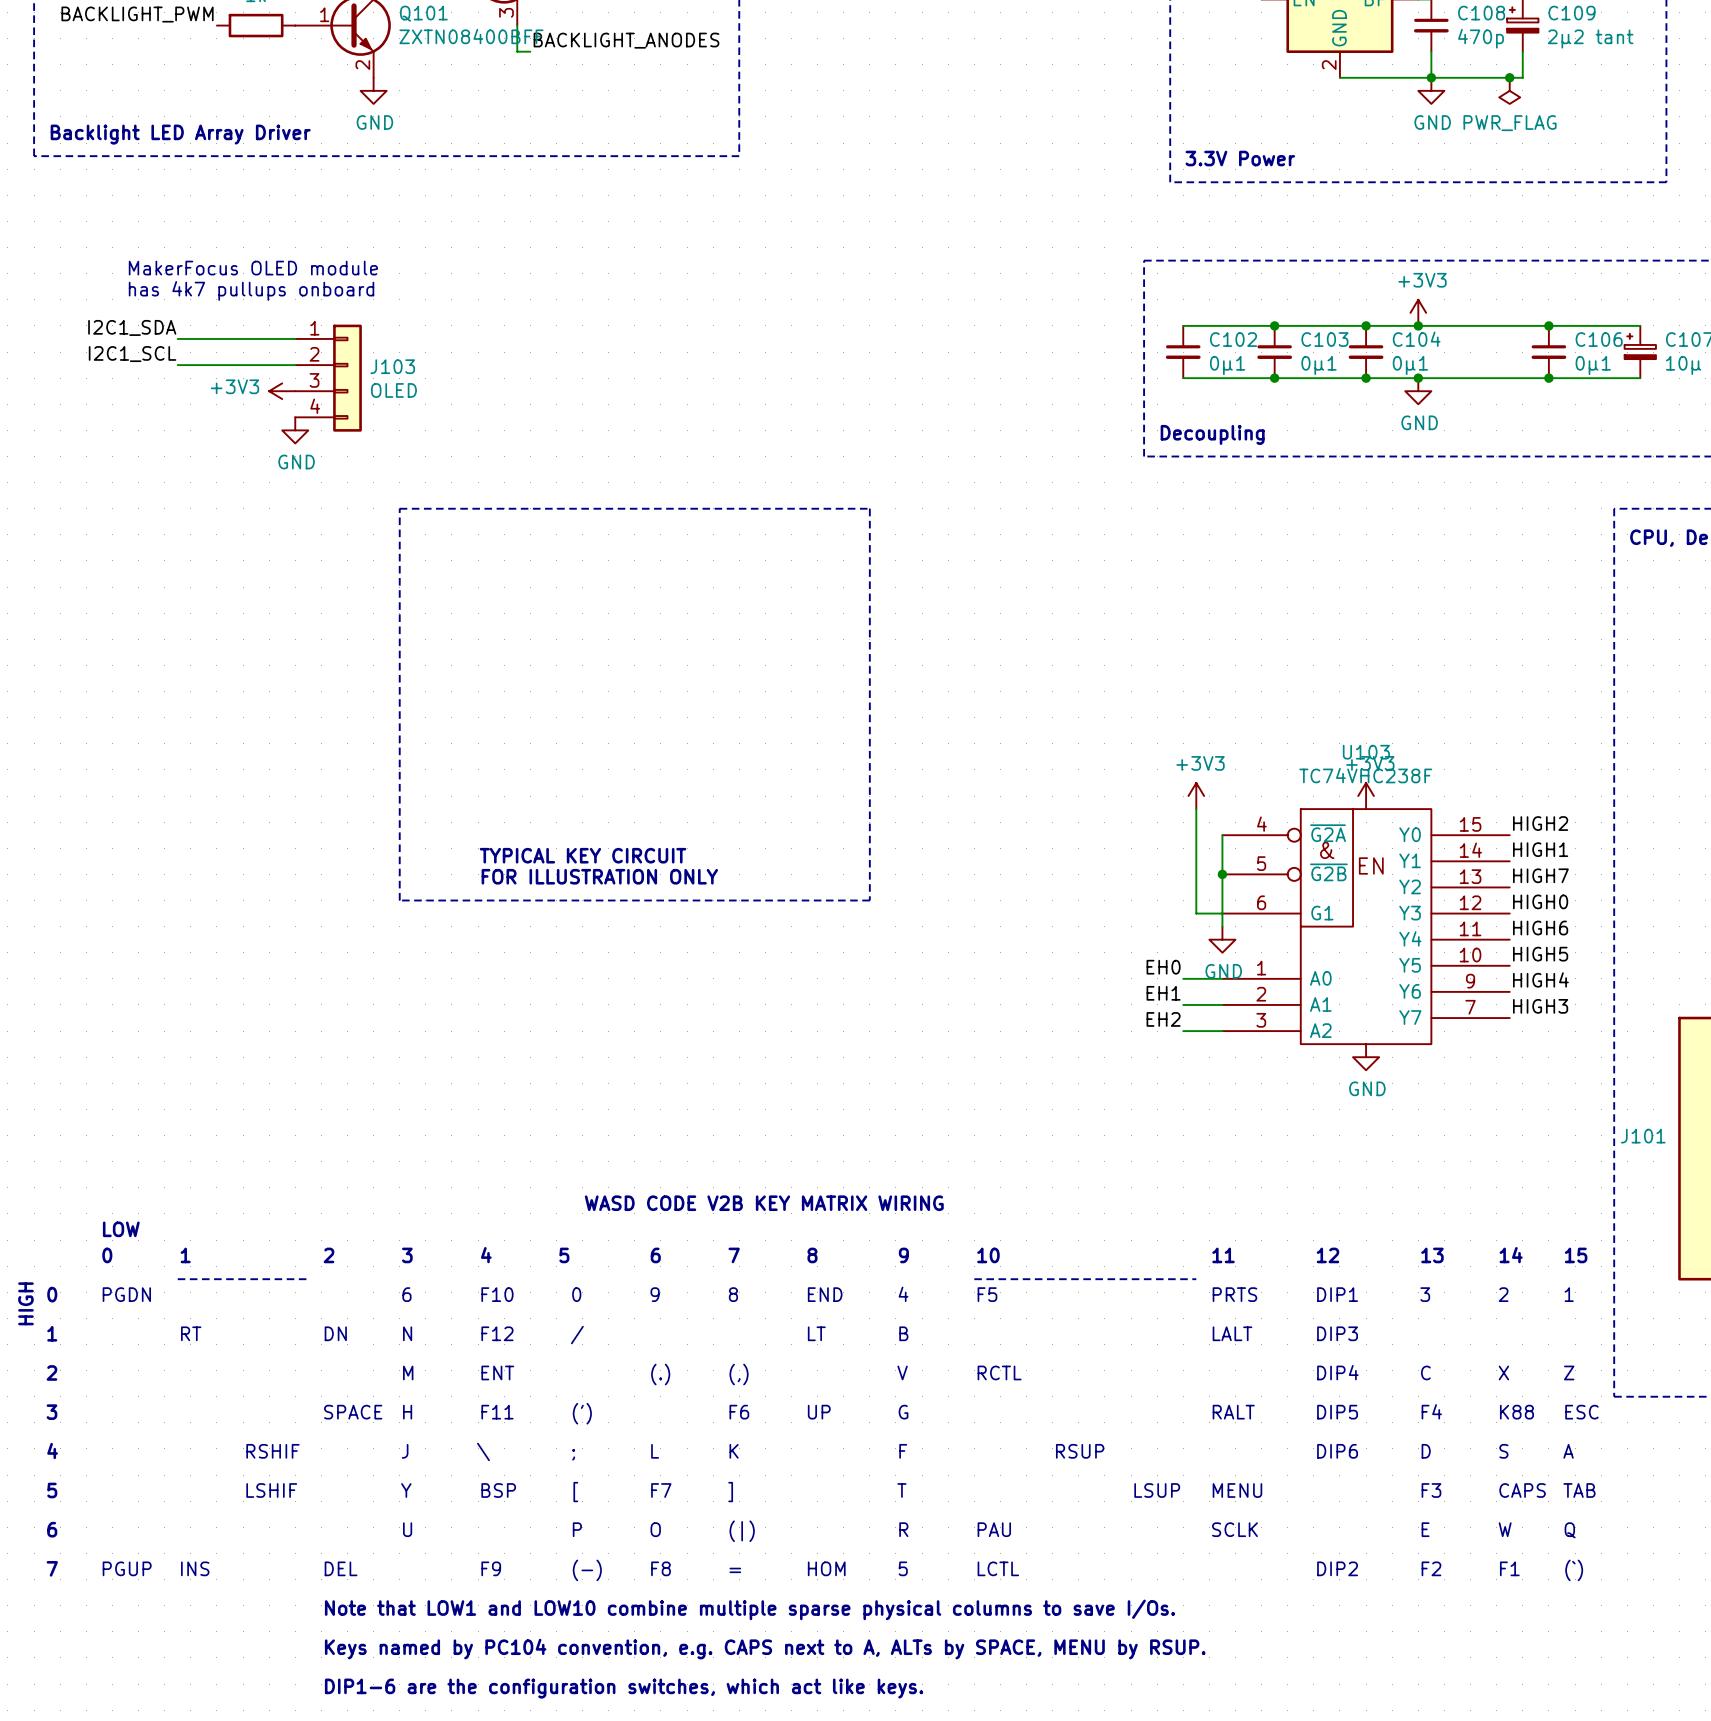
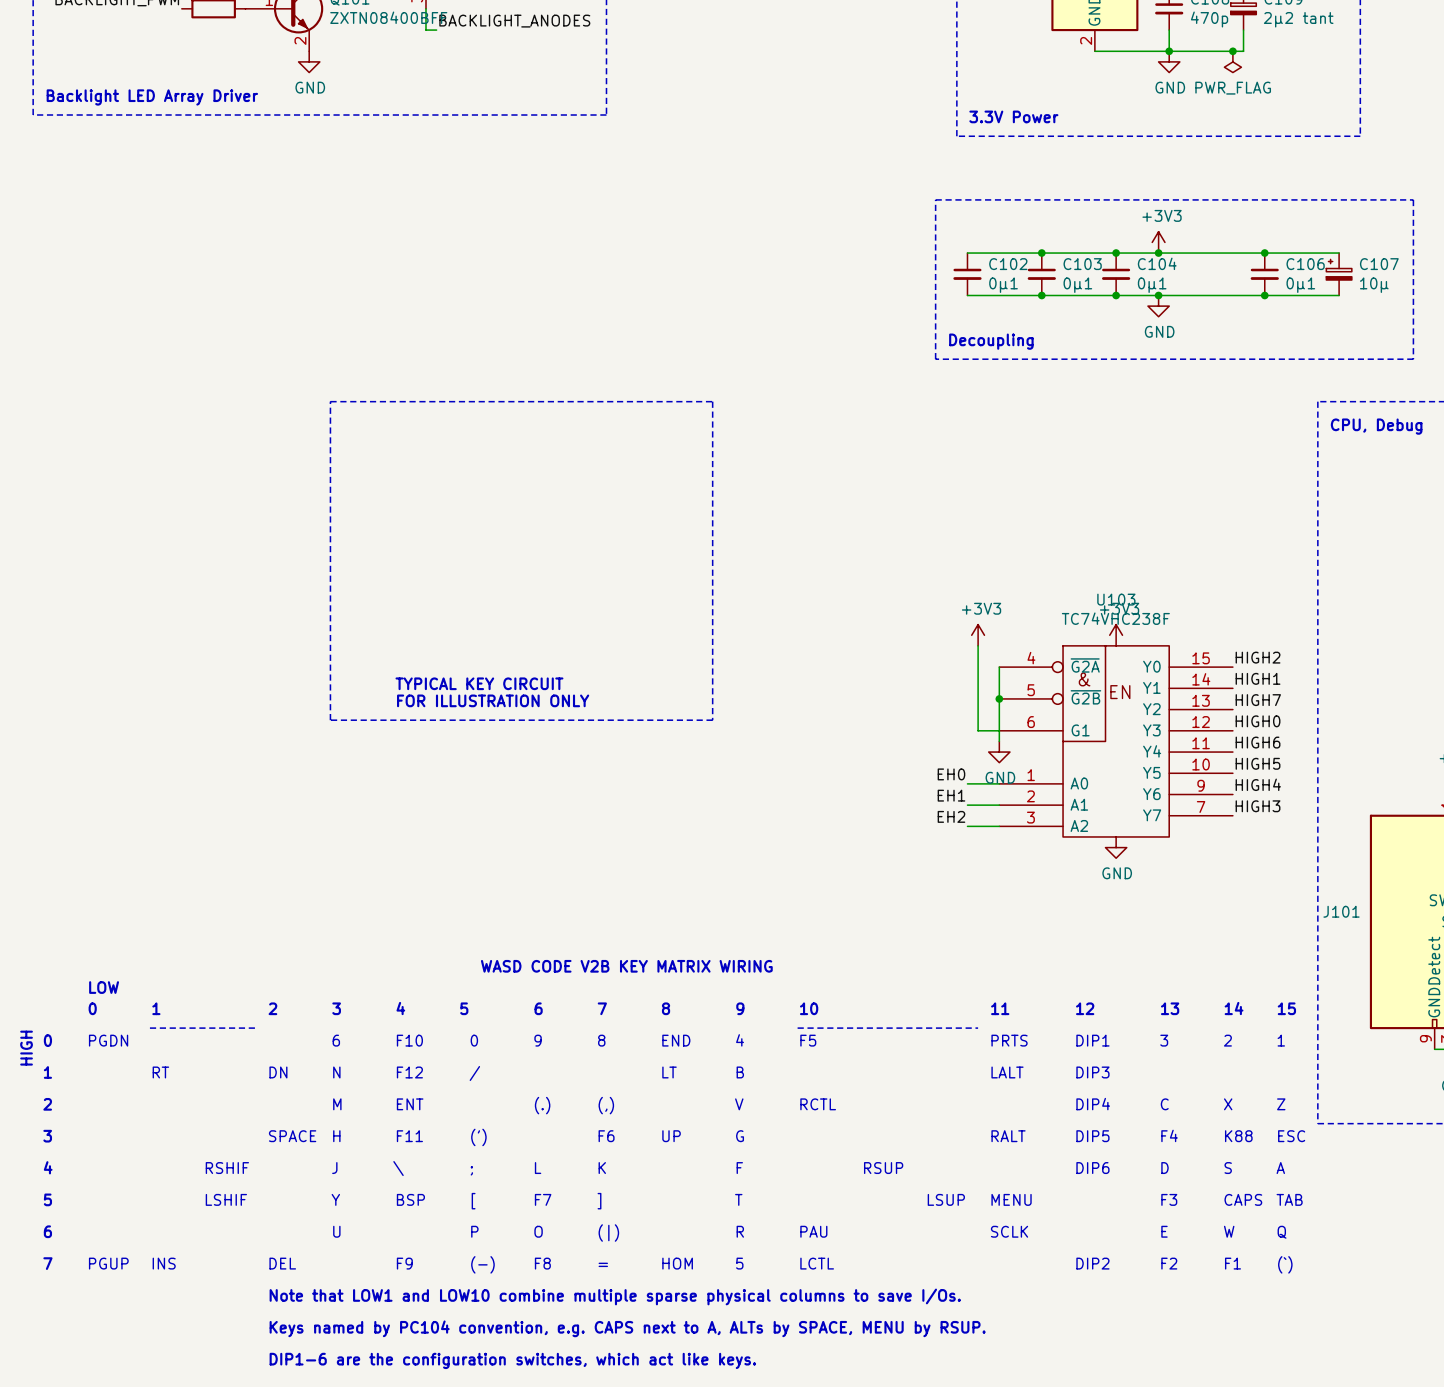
text: MakerFocus OLED module (253, 268) -> none
text: has 4k7 pullups onboard (251, 290) -> none
label: I2C1_SDA (132, 327) -> none
wire: (177, 338) (295, 338) -> none
label: I2C1_SCL (132, 354) -> none
wire: (177, 365) (295, 365) -> none
J103: OLED (328, 378) -> none
power symbol: +3V3 (282, 391) -> none
power symbol: GND (295, 430) -> none

